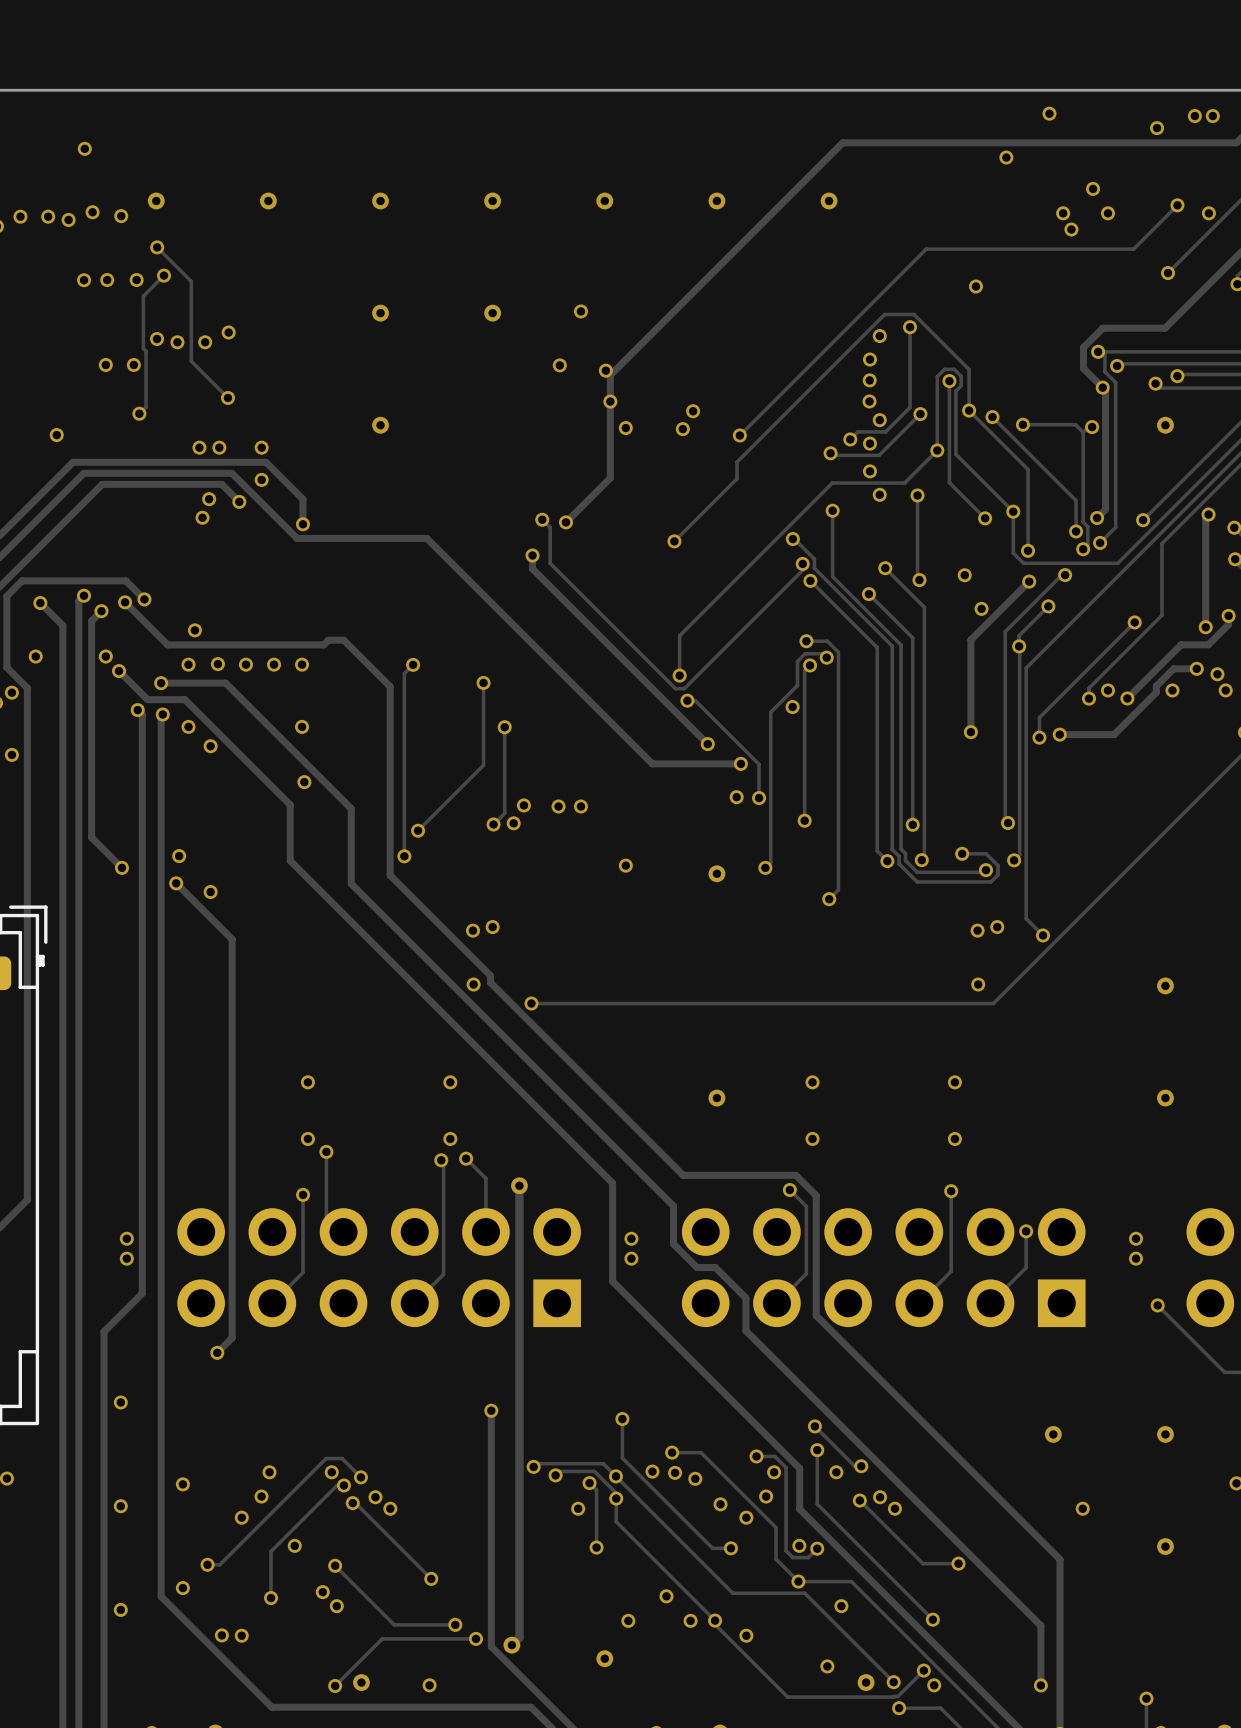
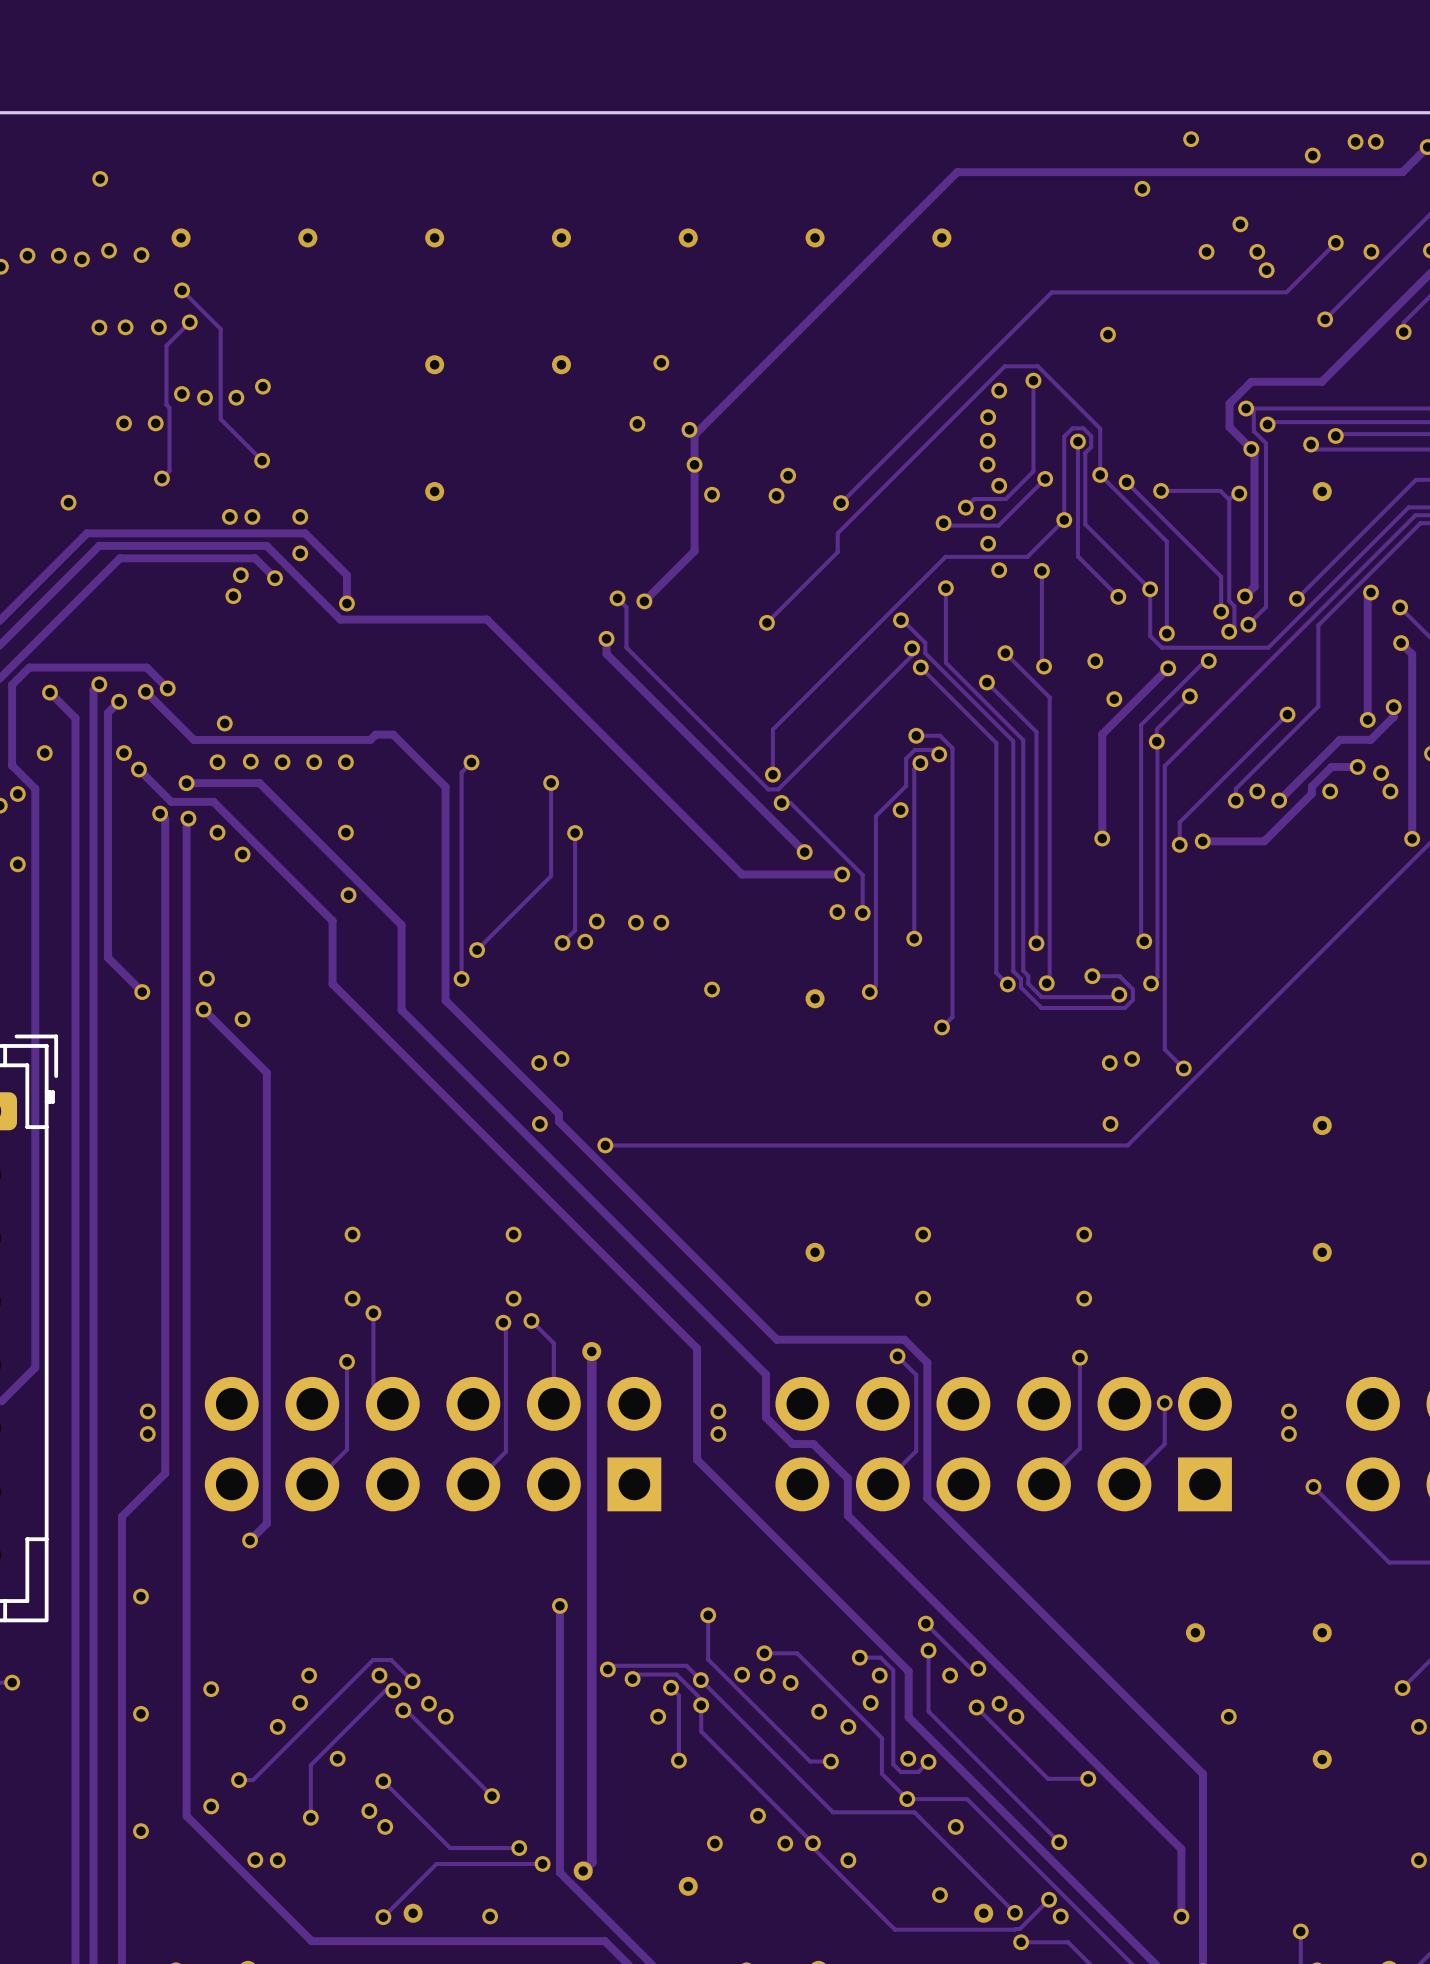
via position: (1071, 229) -> (1266, 270)

